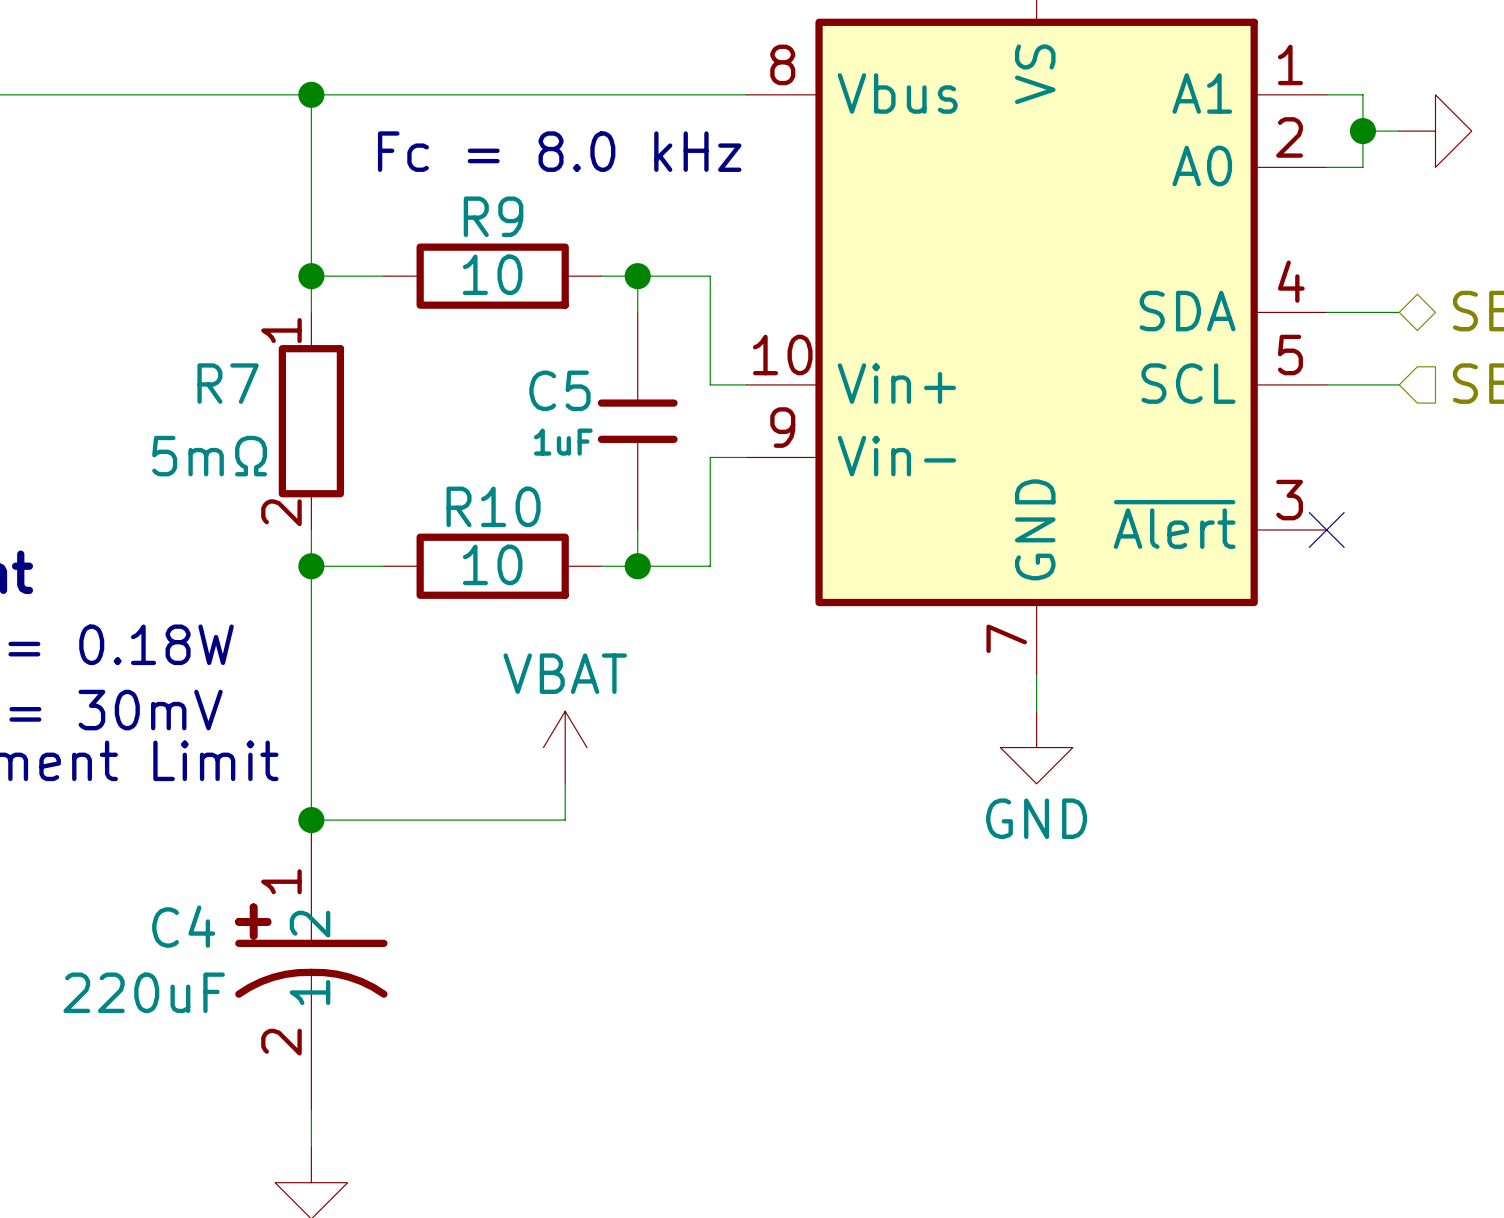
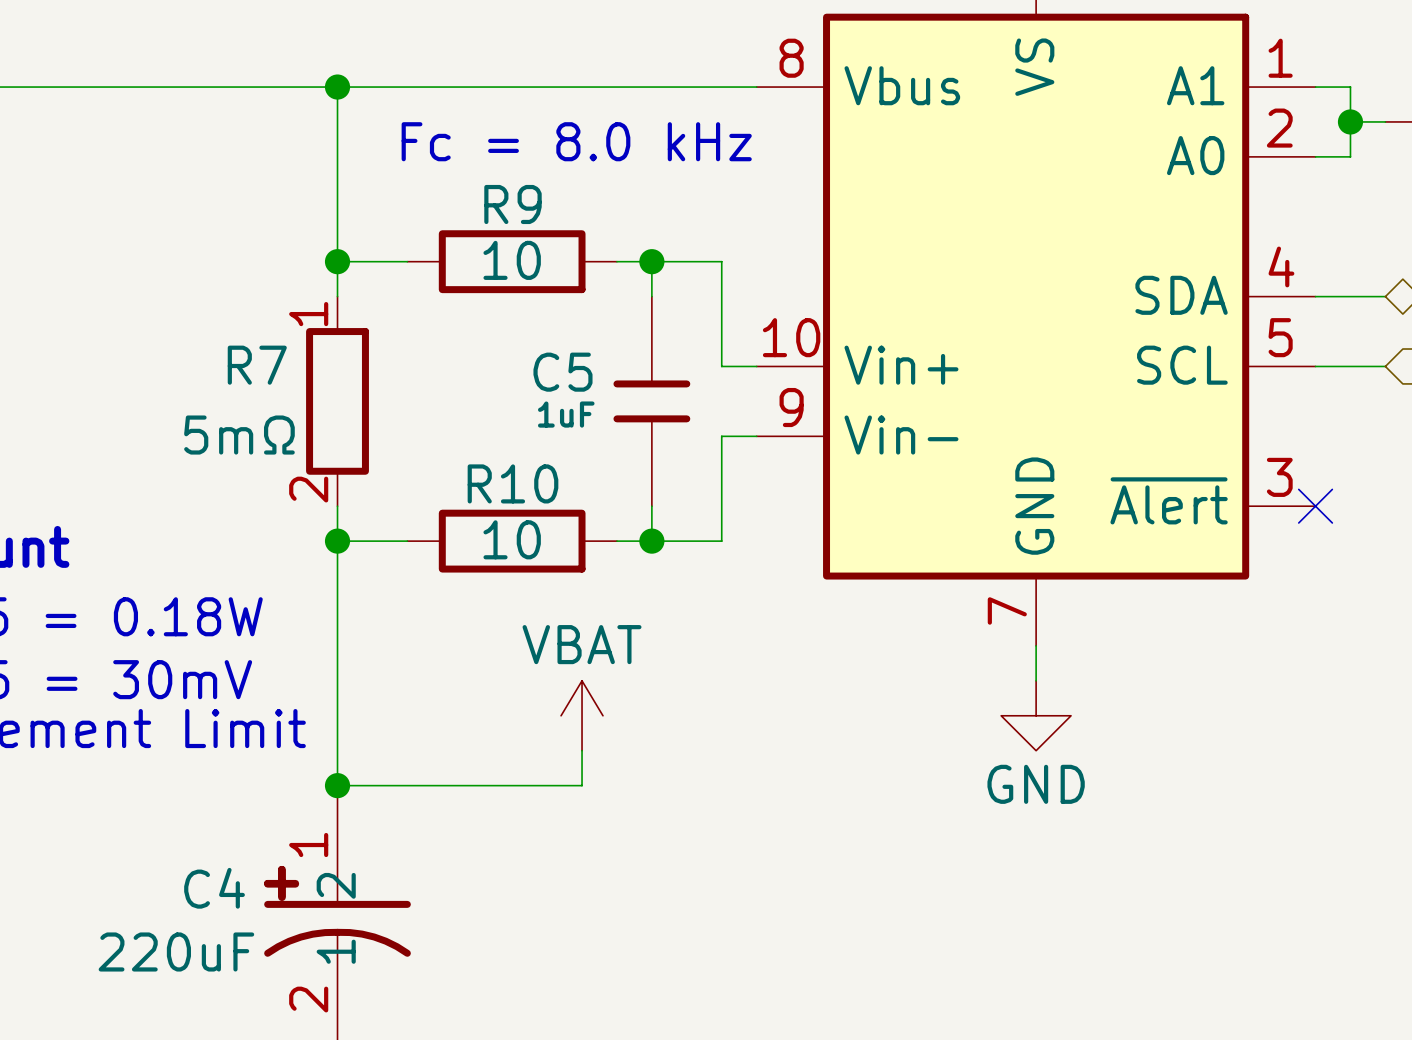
C5 name position: C5 (559, 390) -> C5 (562, 372)
C5 value position: 1uF (563, 442) -> 1uF (566, 414)

